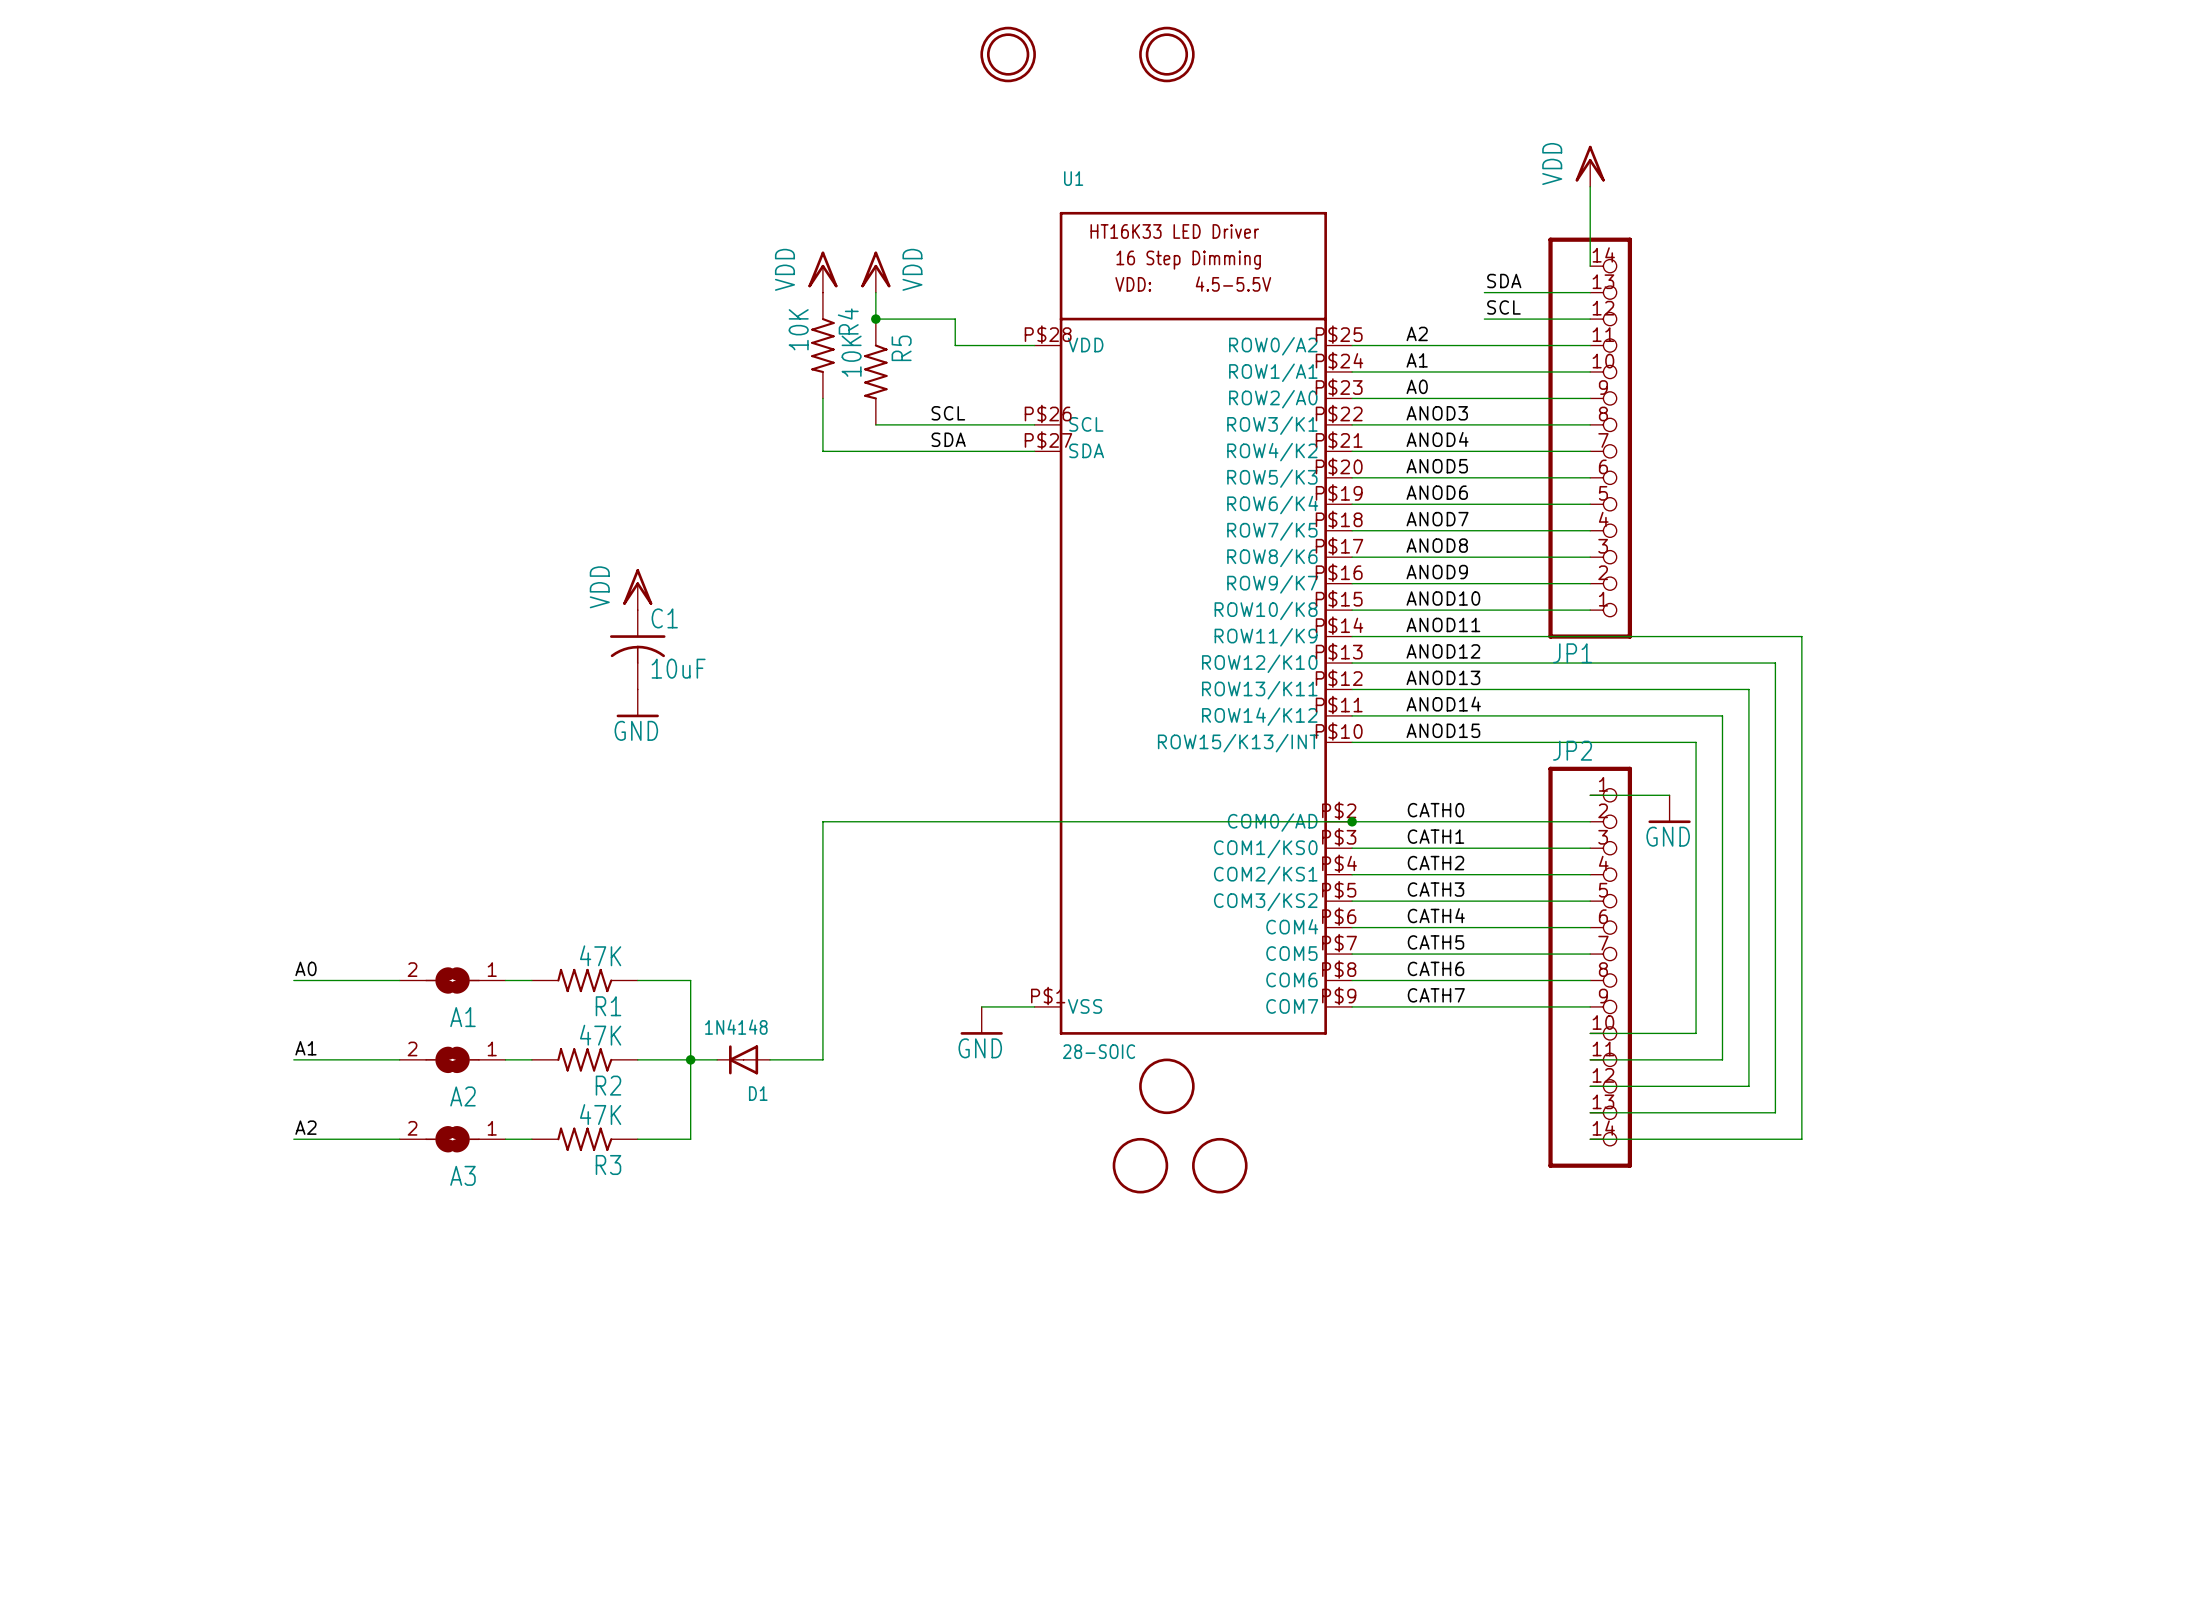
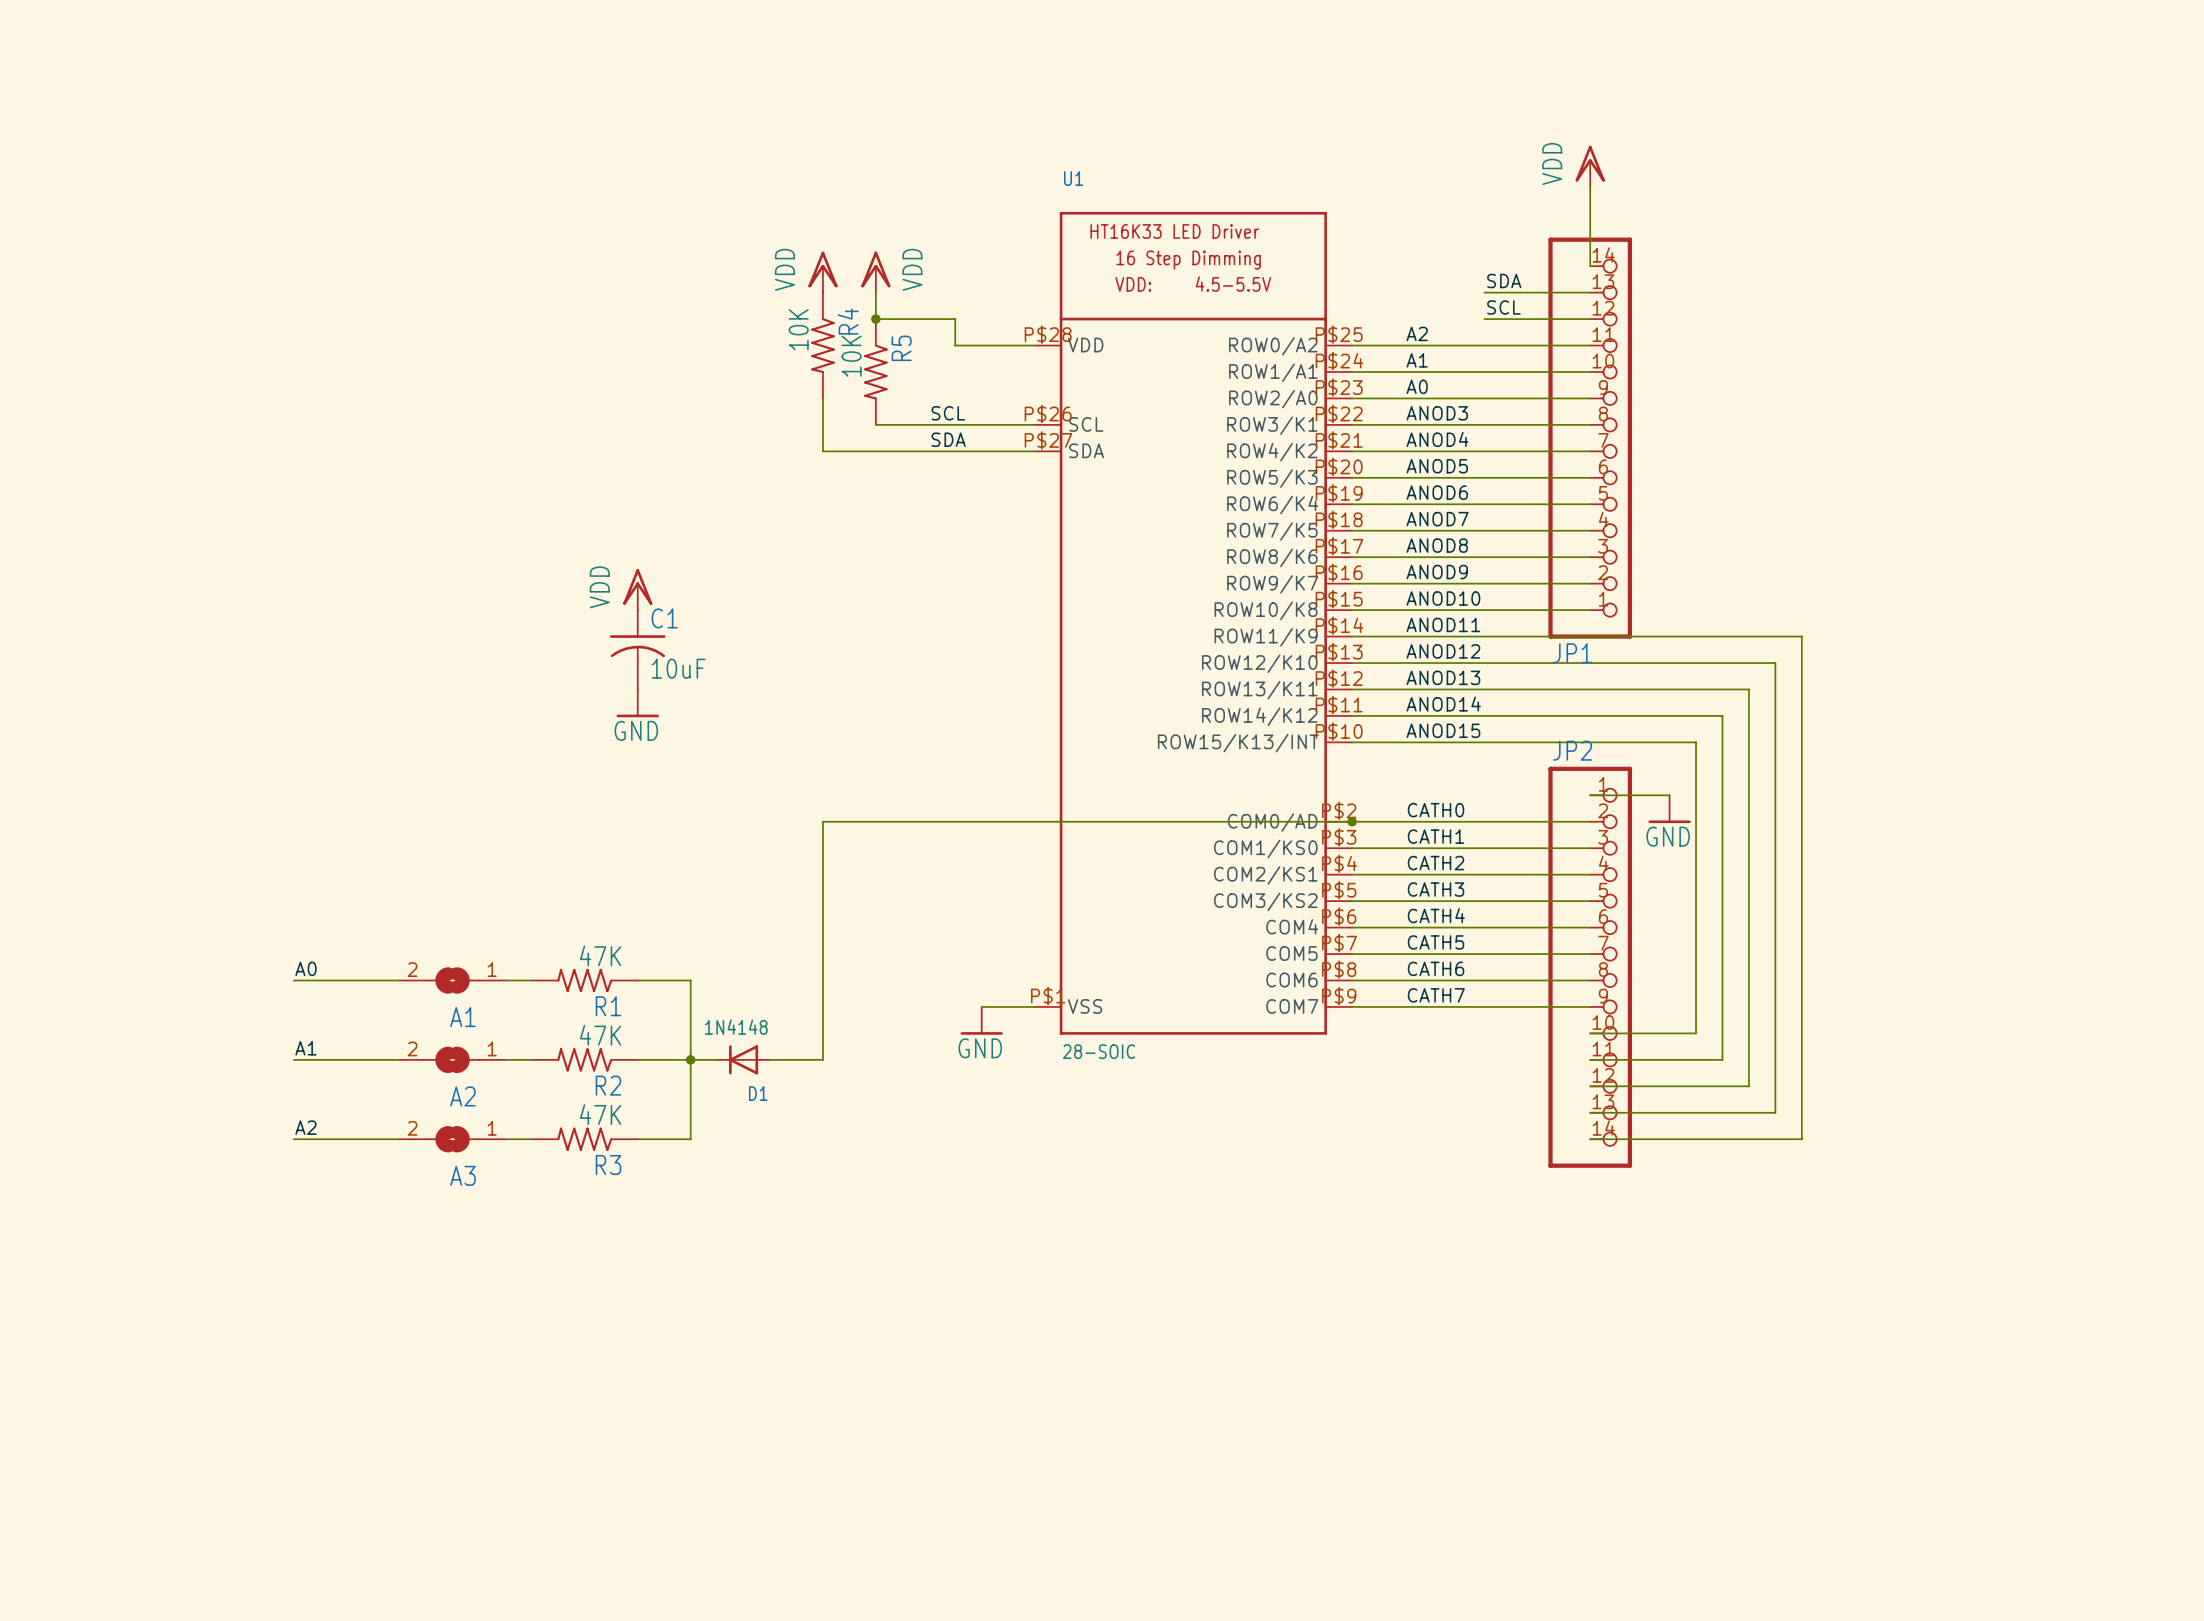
part: (1008, 54) -> none
part: (1166, 54) -> none
part: (1166, 1086) -> none
part: (1140, 1165) -> none
part: (1219, 1165) -> none

